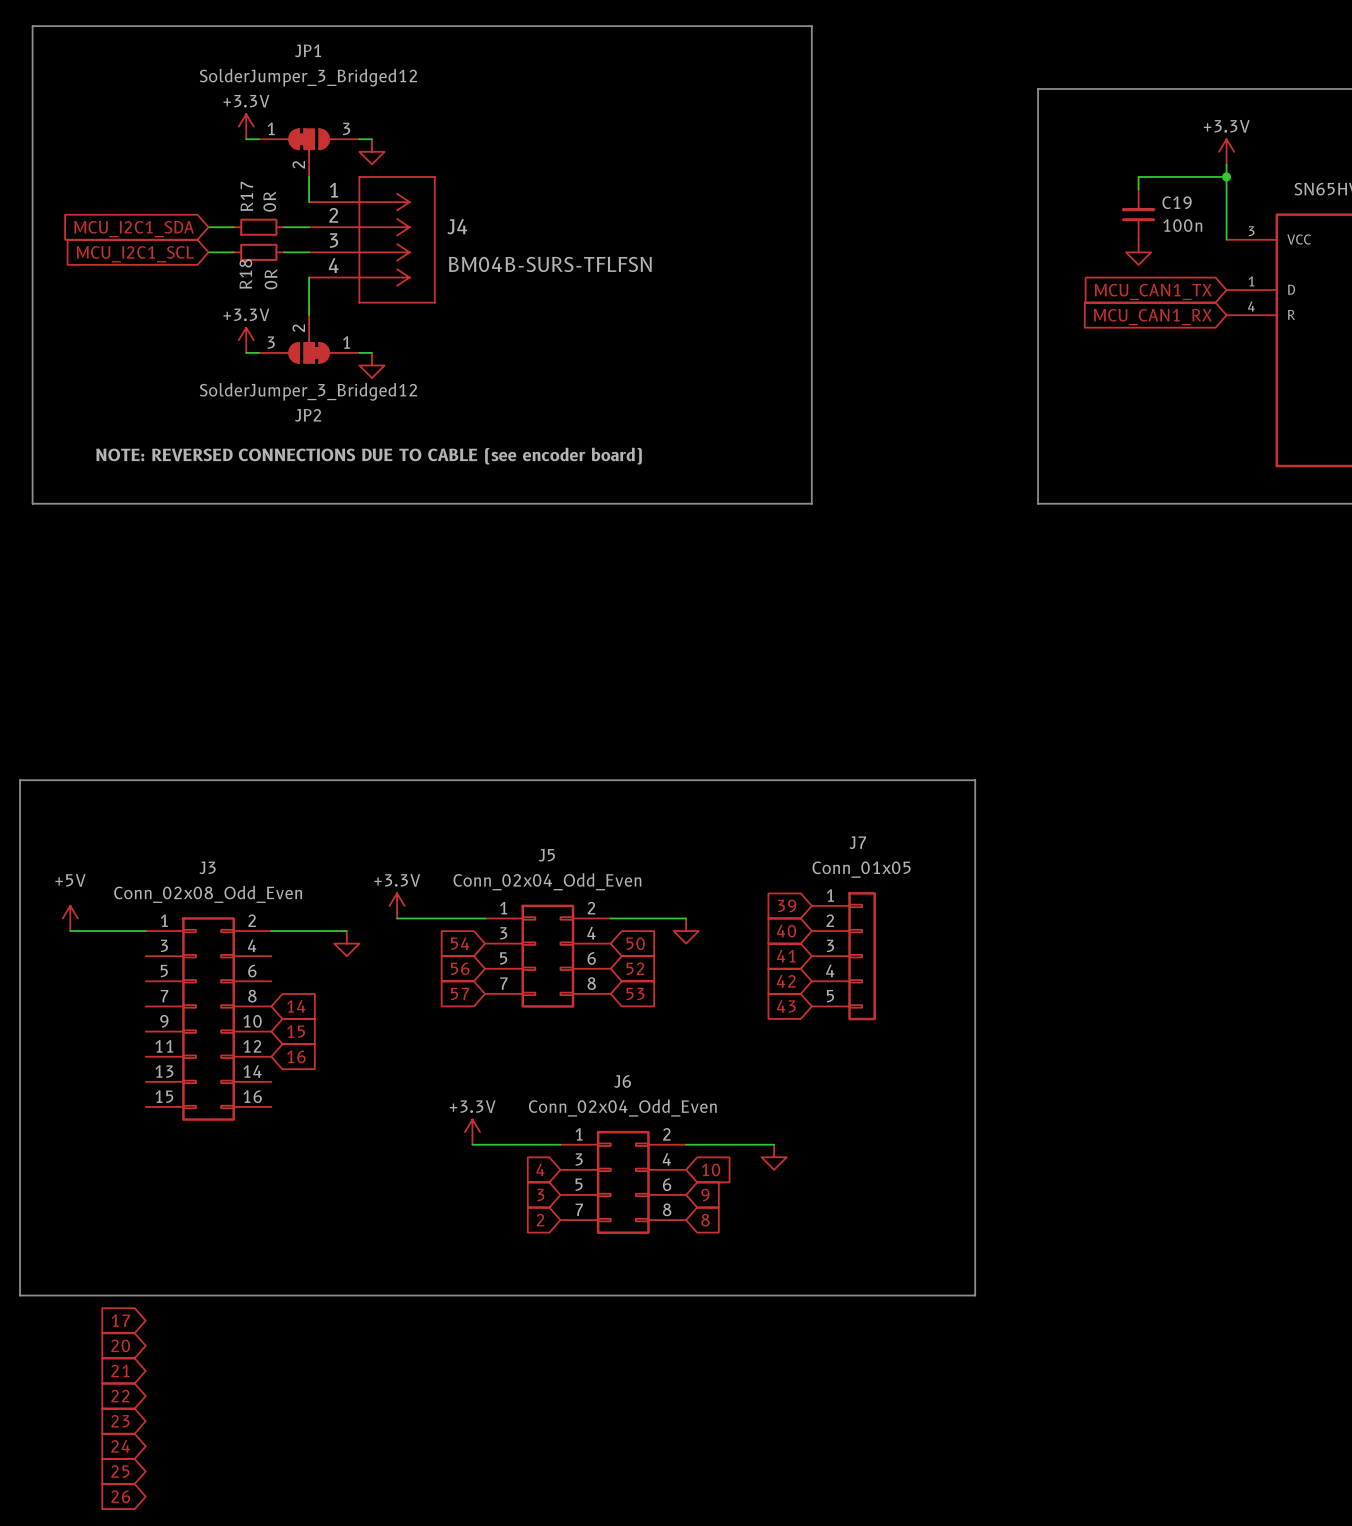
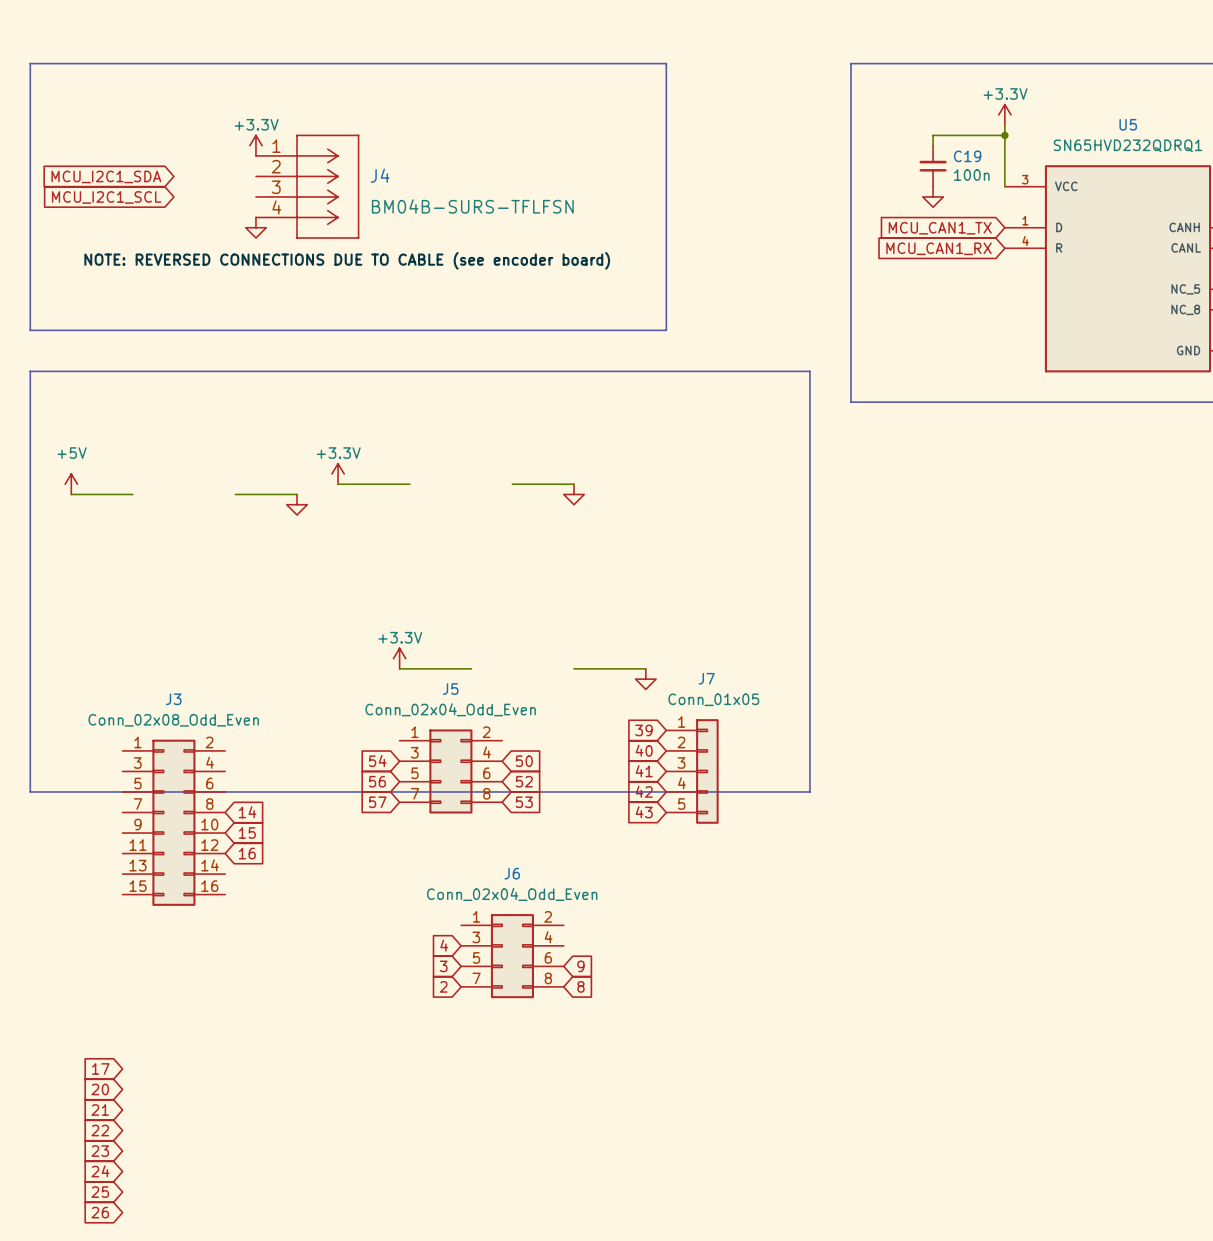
line: (32, 88) (32, 26) (811, 26) (811, 88) -> (30, 63) (666, 63)
power symbol: +3.3V (246, 126) -> none
wire: (246, 139) (258, 139) -> none
wire: (359, 139) (371, 139) -> none
power symbol: (371, 151) -> none
JP1: SolderJumper_3_Bridged12 (309, 153) -> none
power symbol: none -> +3.3V (255, 145)
wire: (208, 227) (233, 227) -> none
R17: 0R (258, 227) -> none
wire: (283, 227) (309, 227) -> none
wire: (208, 252) (233, 252) -> none
R18: 0R (258, 252) -> none
wire: (283, 252) (309, 252) -> none
wire: (309, 277) (309, 315) -> none
power symbol: none -> (255, 227)
JP2: SolderJumper_3_Bridged12 (309, 339) -> none
power symbol: +3.3V (246, 340) -> none
wire: (246, 352) (258, 352) -> none
wire: (359, 352) (371, 352) -> none
power symbol: (371, 365) -> none
line: (32, 415) (32, 466) -> (30, 402) (30, 791) (809, 791) (809, 371) (30, 371)
line: (811, 415) (811, 503) (32, 503) -> (666, 330) (30, 330)
label position: NOTE: REVERSED CONNECTIONS DUE TO CABLE (see encoder board) (369, 456) -> NOTE: REVERSED CONNECTIONS DUE TO CABLE (see encoder board) (347, 260)
power symbol: none -> +3.3V (338, 473)
power symbol: none -> +5V (71, 484)
wire: none -> (338, 484) (409, 484)
wire: none -> (512, 484) (574, 484)
wire: none -> (71, 494) (132, 494)
wire: none -> (235, 494) (297, 494)
power symbol: none -> (574, 494)
power symbol: none -> (297, 504)
line: (20, 780) (20, 1295) (975, 1295) (975, 780) (20, 780) -> none
wire: none -> (574, 668) (645, 668)
power symbol position: +3.3V (397, 905) -> +3.3V (399, 658)
power symbol: +5V (70, 918) -> none
wire: (397, 918) (485, 918) -> (399, 668) (471, 668)
wire: (610, 918) (686, 918) -> none
wire: (70, 931) (145, 931) -> none
wire: (271, 931) (346, 931) -> none
power symbol position: (686, 931) -> (645, 679)
power symbol: (346, 943) -> none
power symbol: +3.3V (472, 1132) -> none
wire: (472, 1144) (560, 1144) -> none
wire: (686, 1144) (774, 1144) -> none
power symbol: (774, 1157) -> none
global label: 10 (711, 1169) -> none

